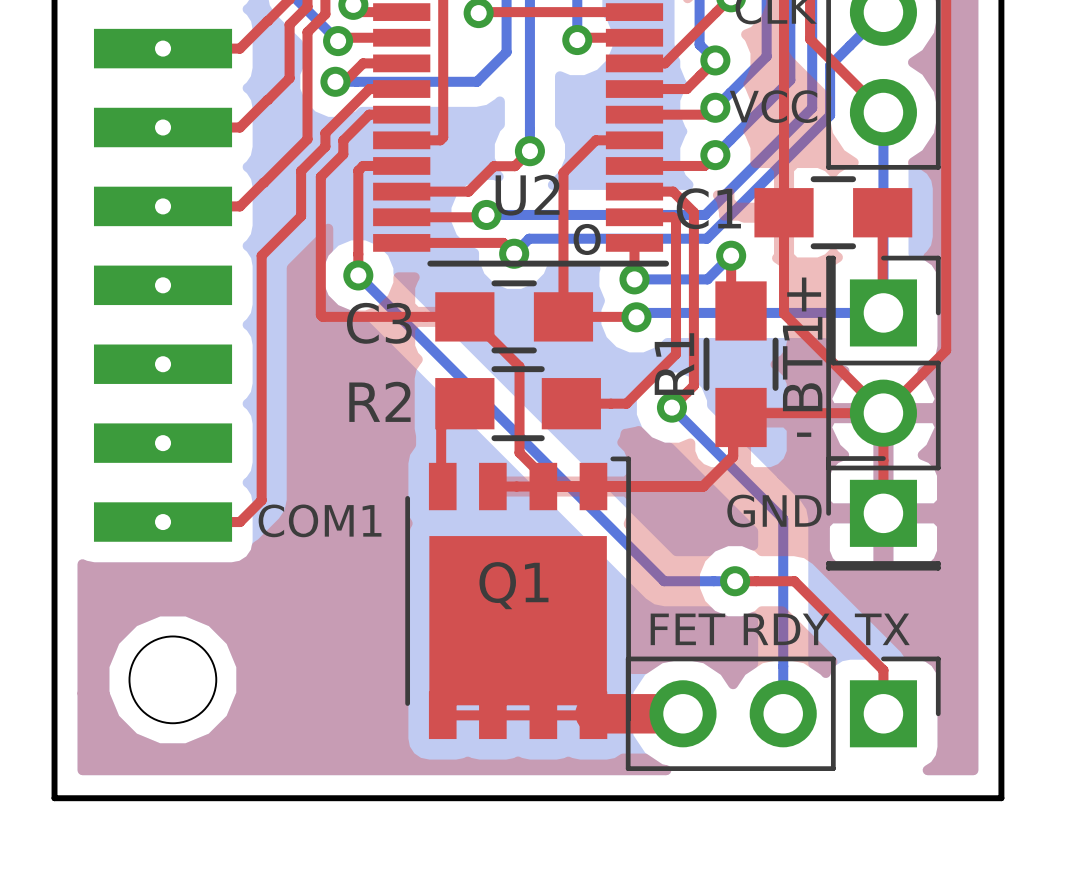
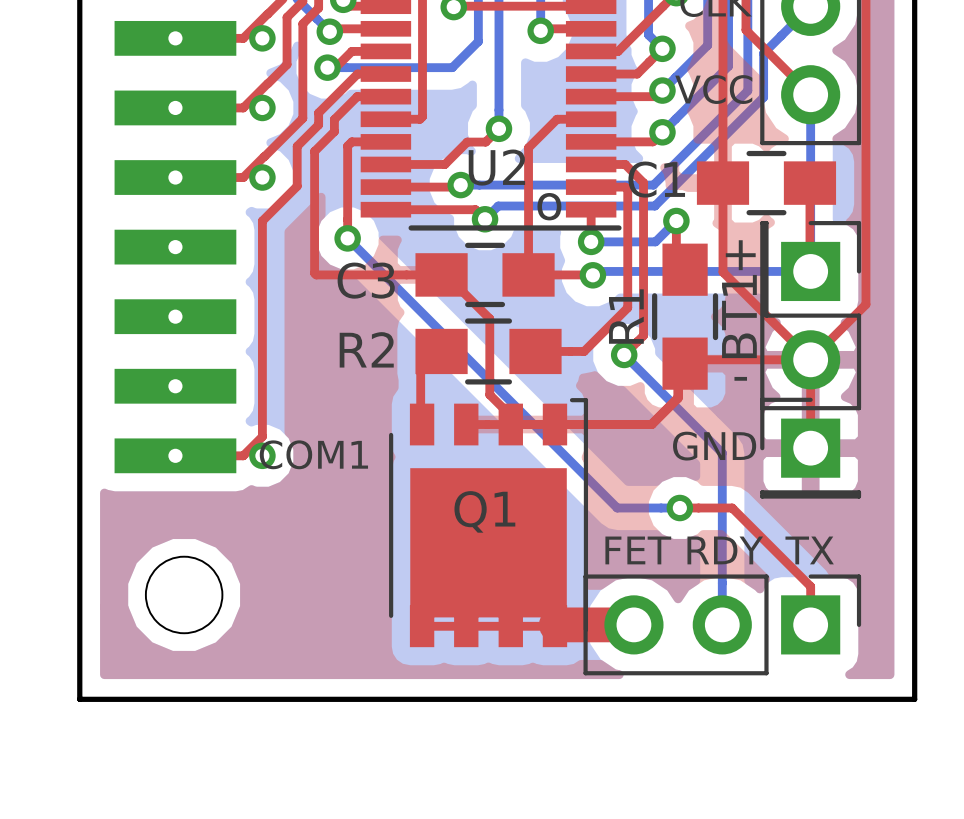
via: none -> (262, 38)
via: none -> (262, 107)
via: none -> (262, 177)
via: none -> (262, 455)

